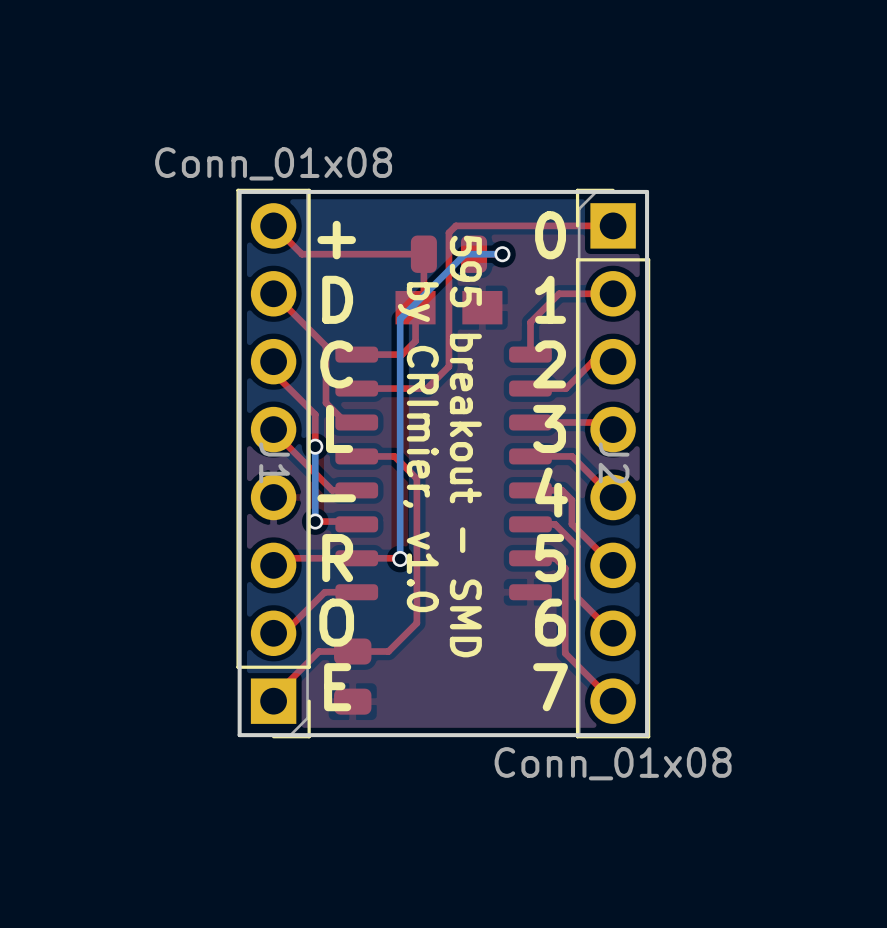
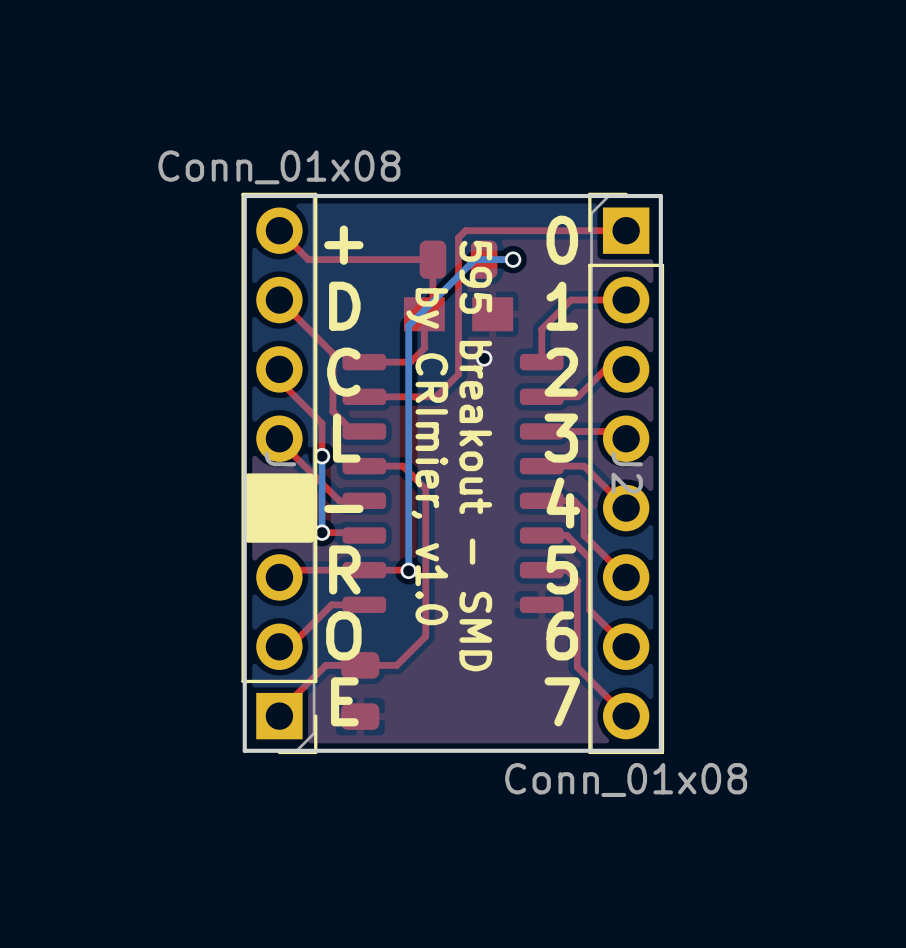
via: none -> (484, 358)
drawing: none -> [244, 473, 315, 543]

